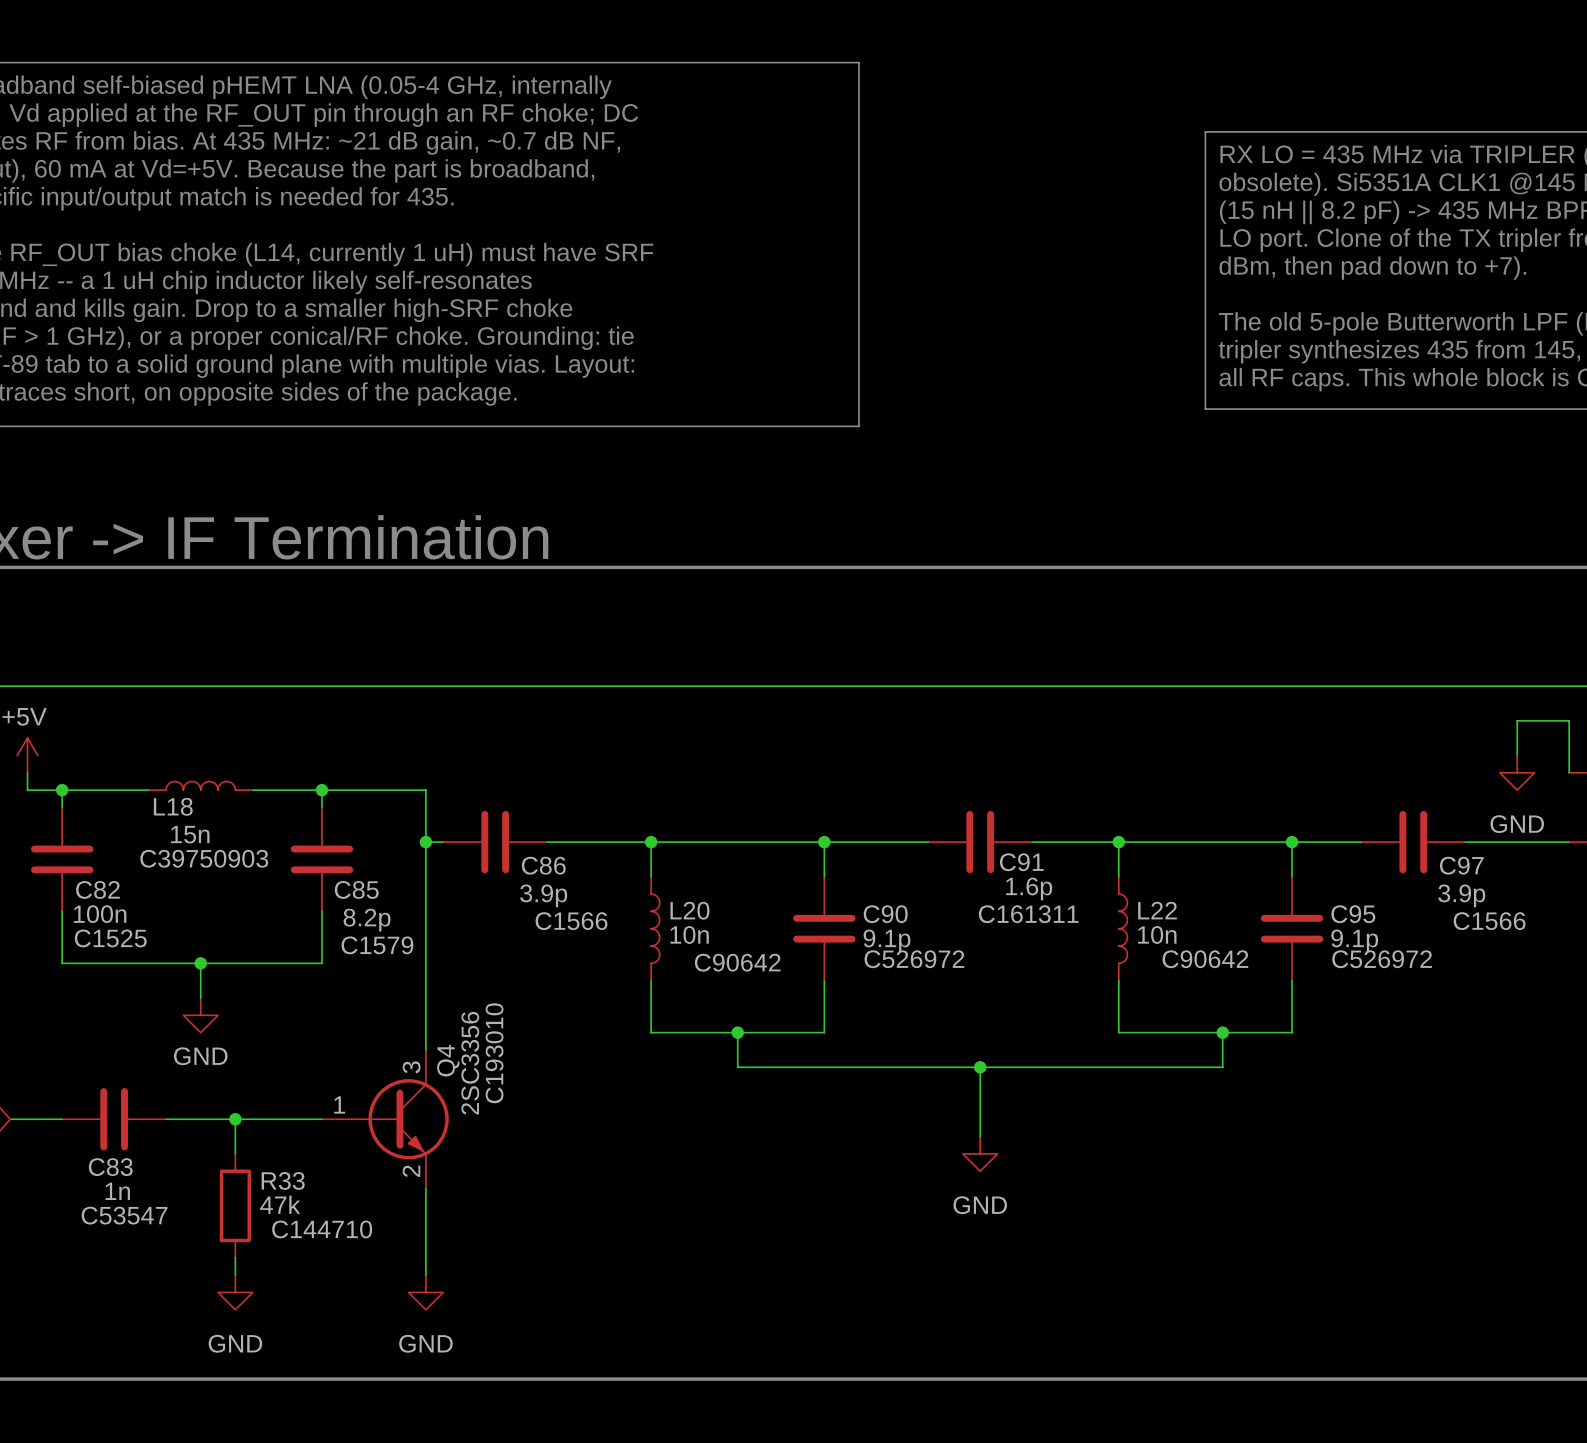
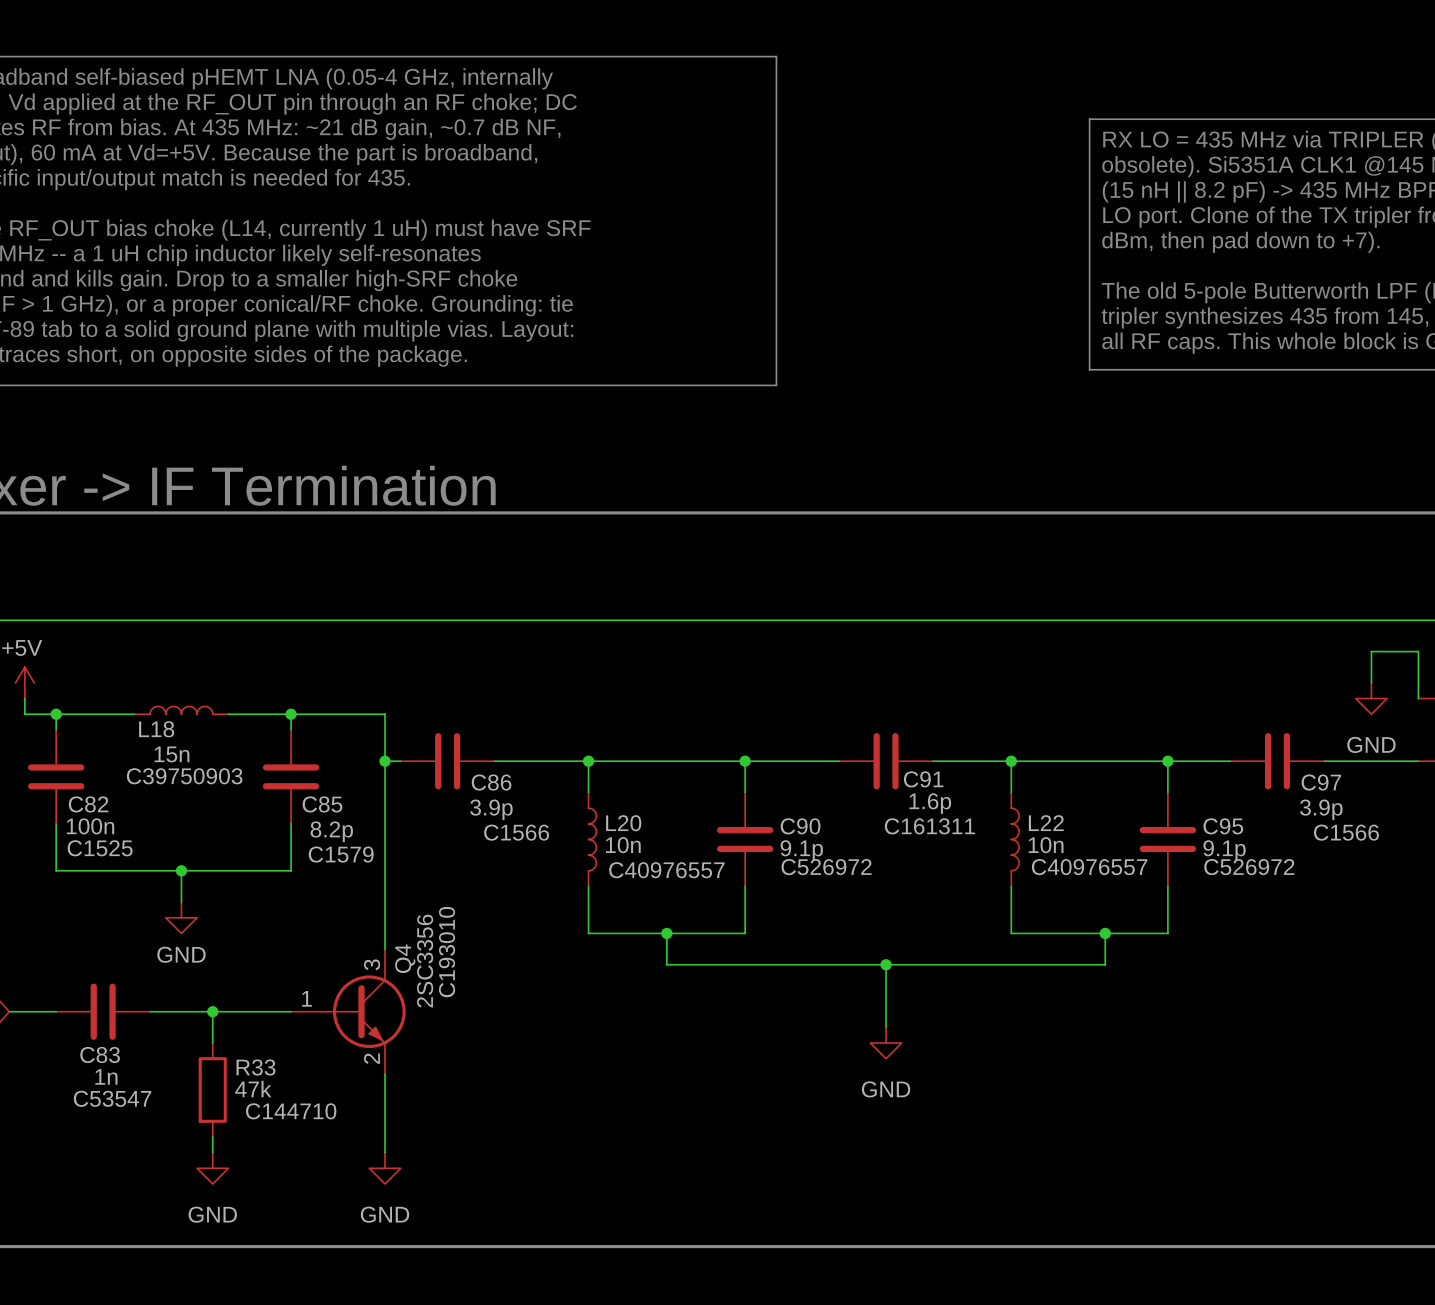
L22 text: C90642 (1205, 959) -> C40976557 (1089, 867)
L20 text: C90642 (737, 962) -> C40976557 (666, 870)

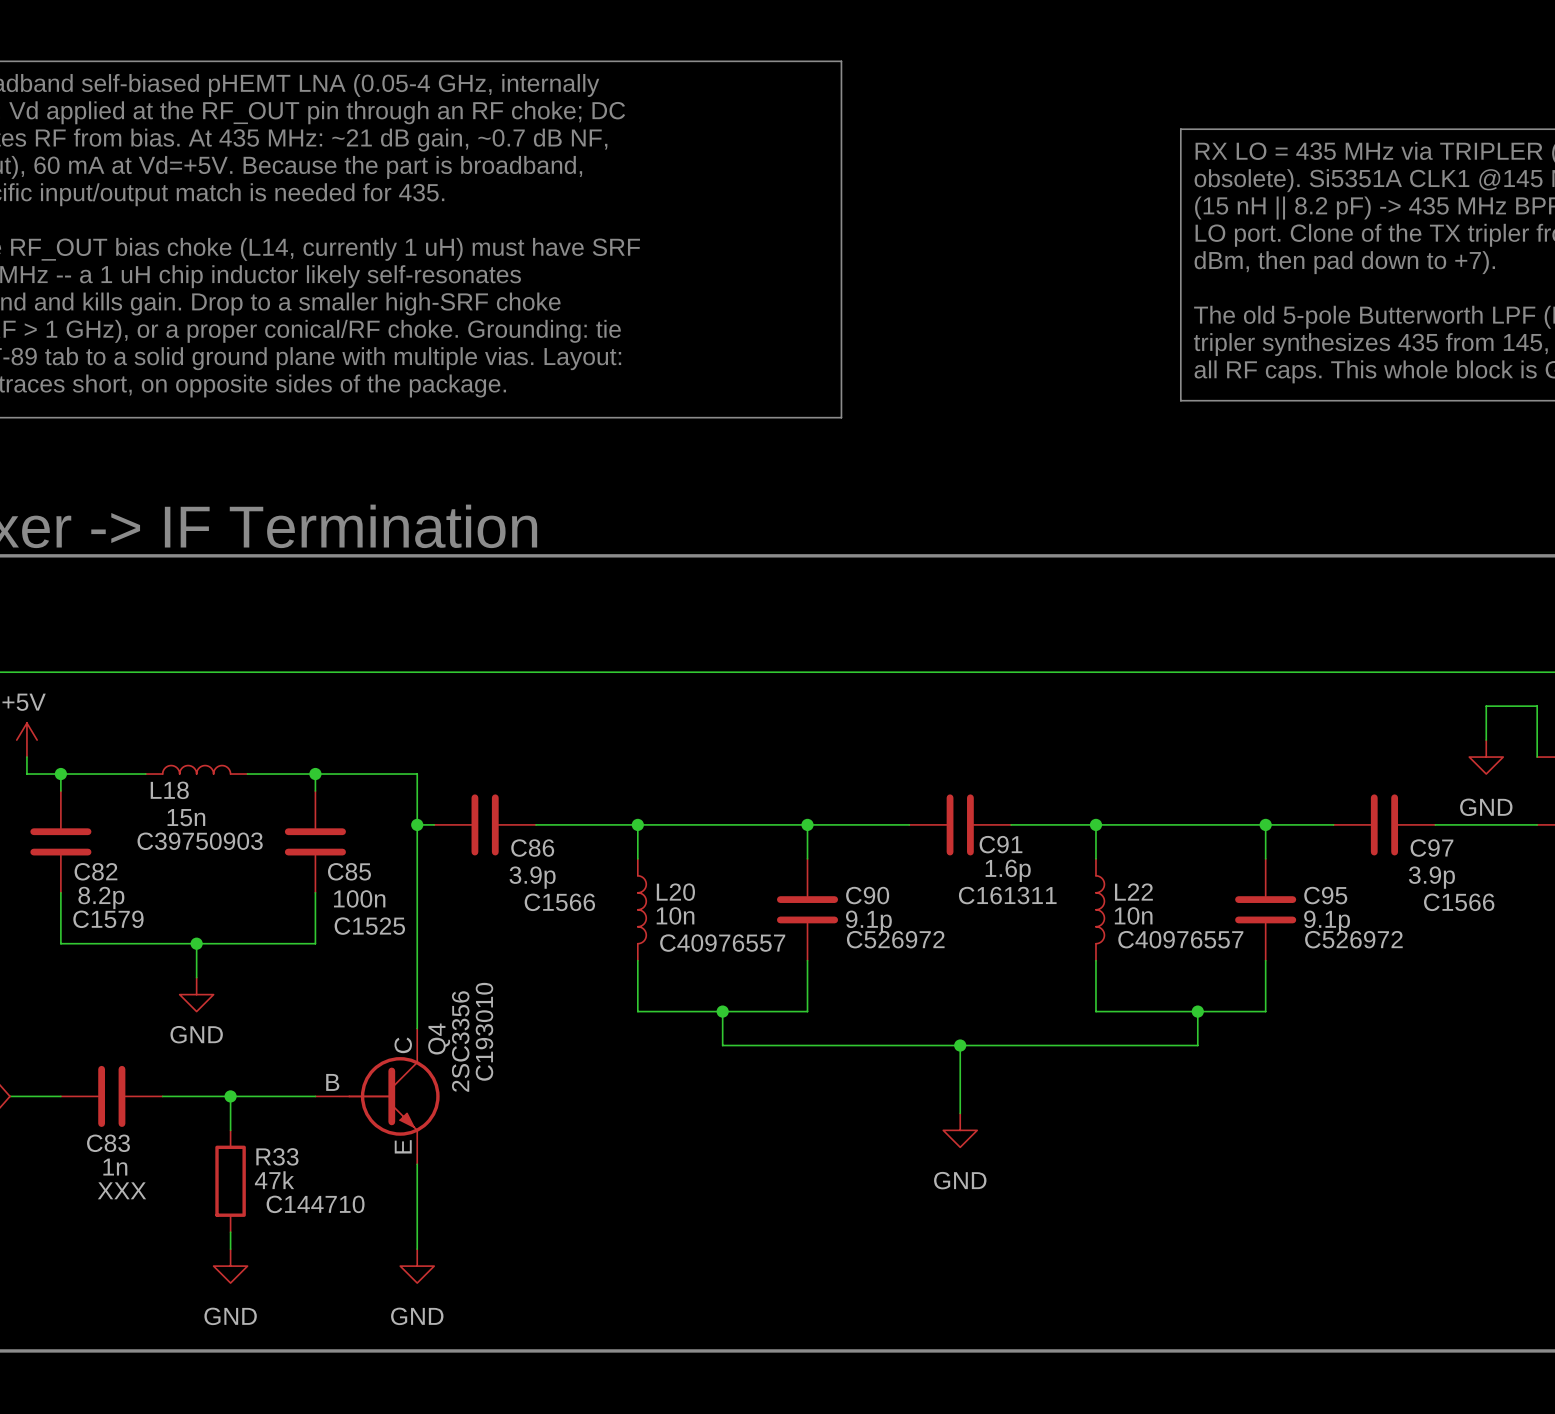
C82 value: 100n (90, 826) -> 8.2p (101, 897)
C85 value: 8.2p (331, 831) -> 100n (359, 898)
C82 text: C1525 (100, 848) -> C1579 (108, 919)
C85 text: C1579 (341, 854) -> C1525 (369, 926)
Q4 symbol: [291, 949, 406, 1075] -> [315, 1028, 440, 1165]
C83 text: C53547 (112, 1098) -> XXX (121, 1190)

